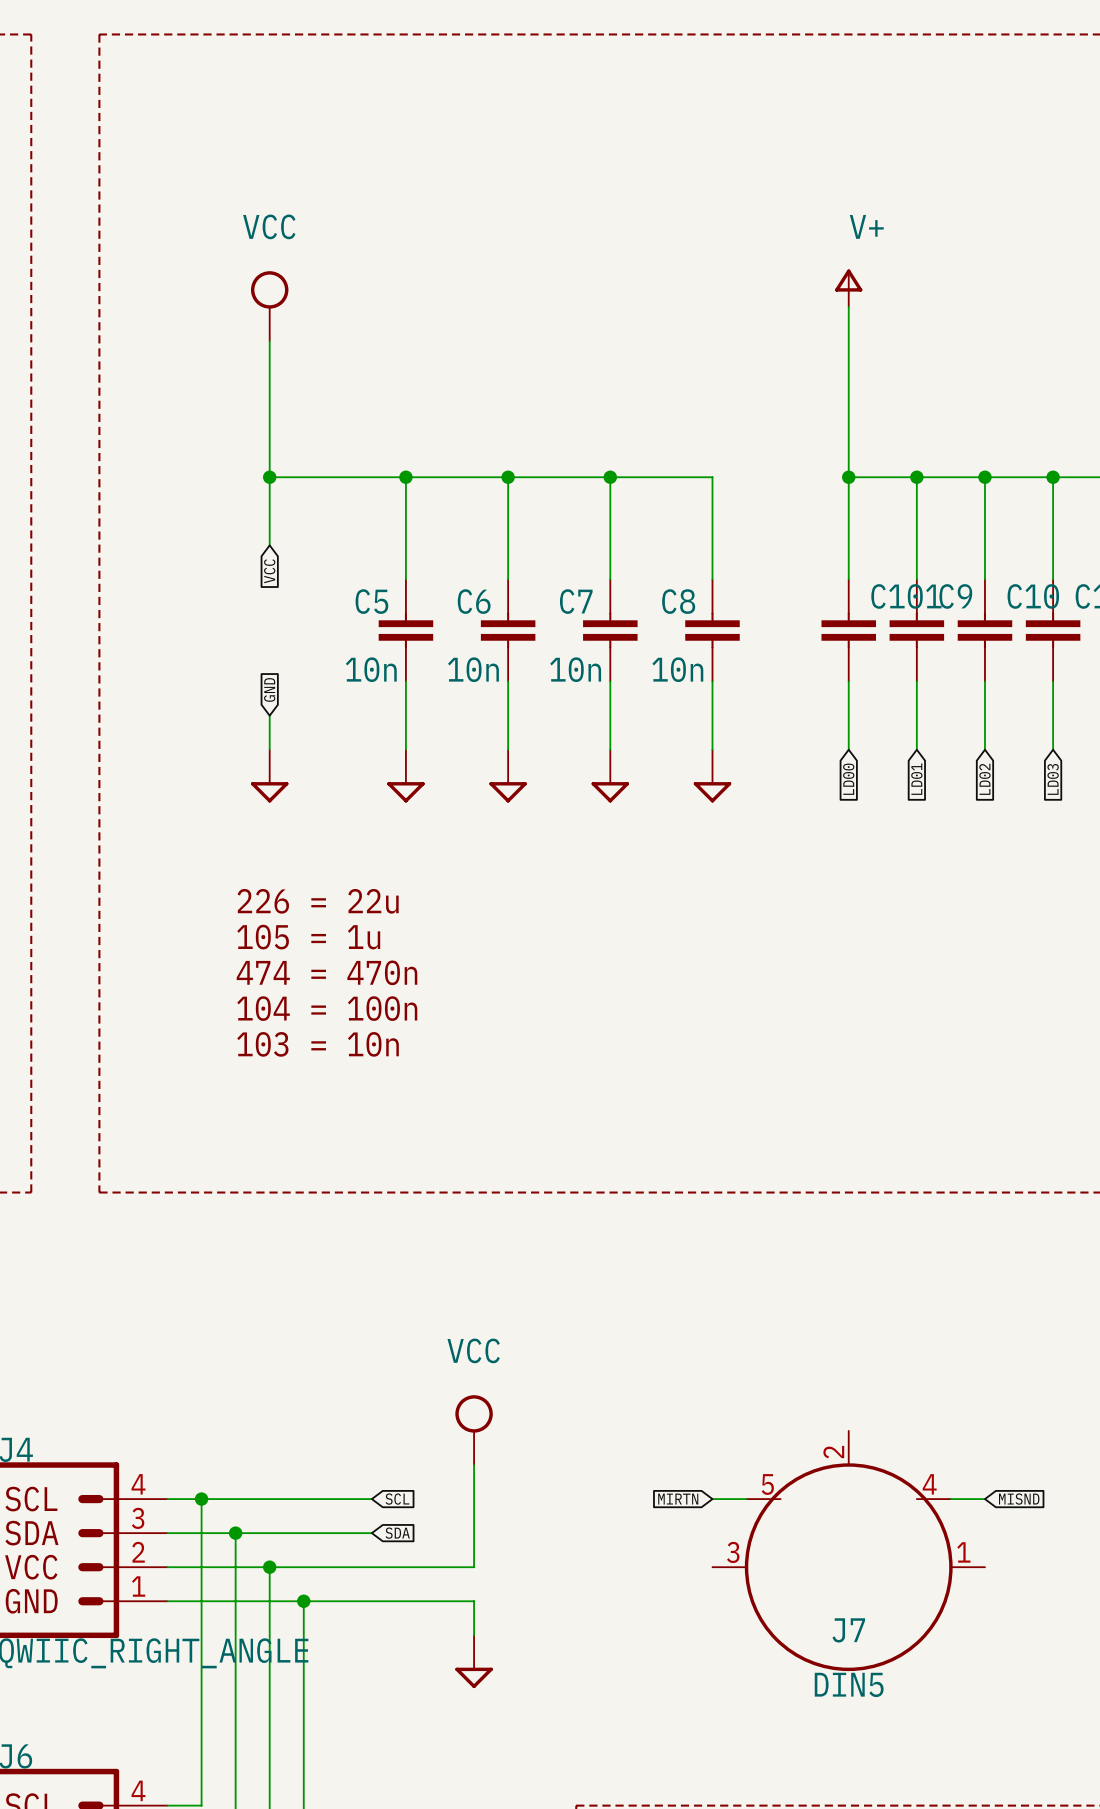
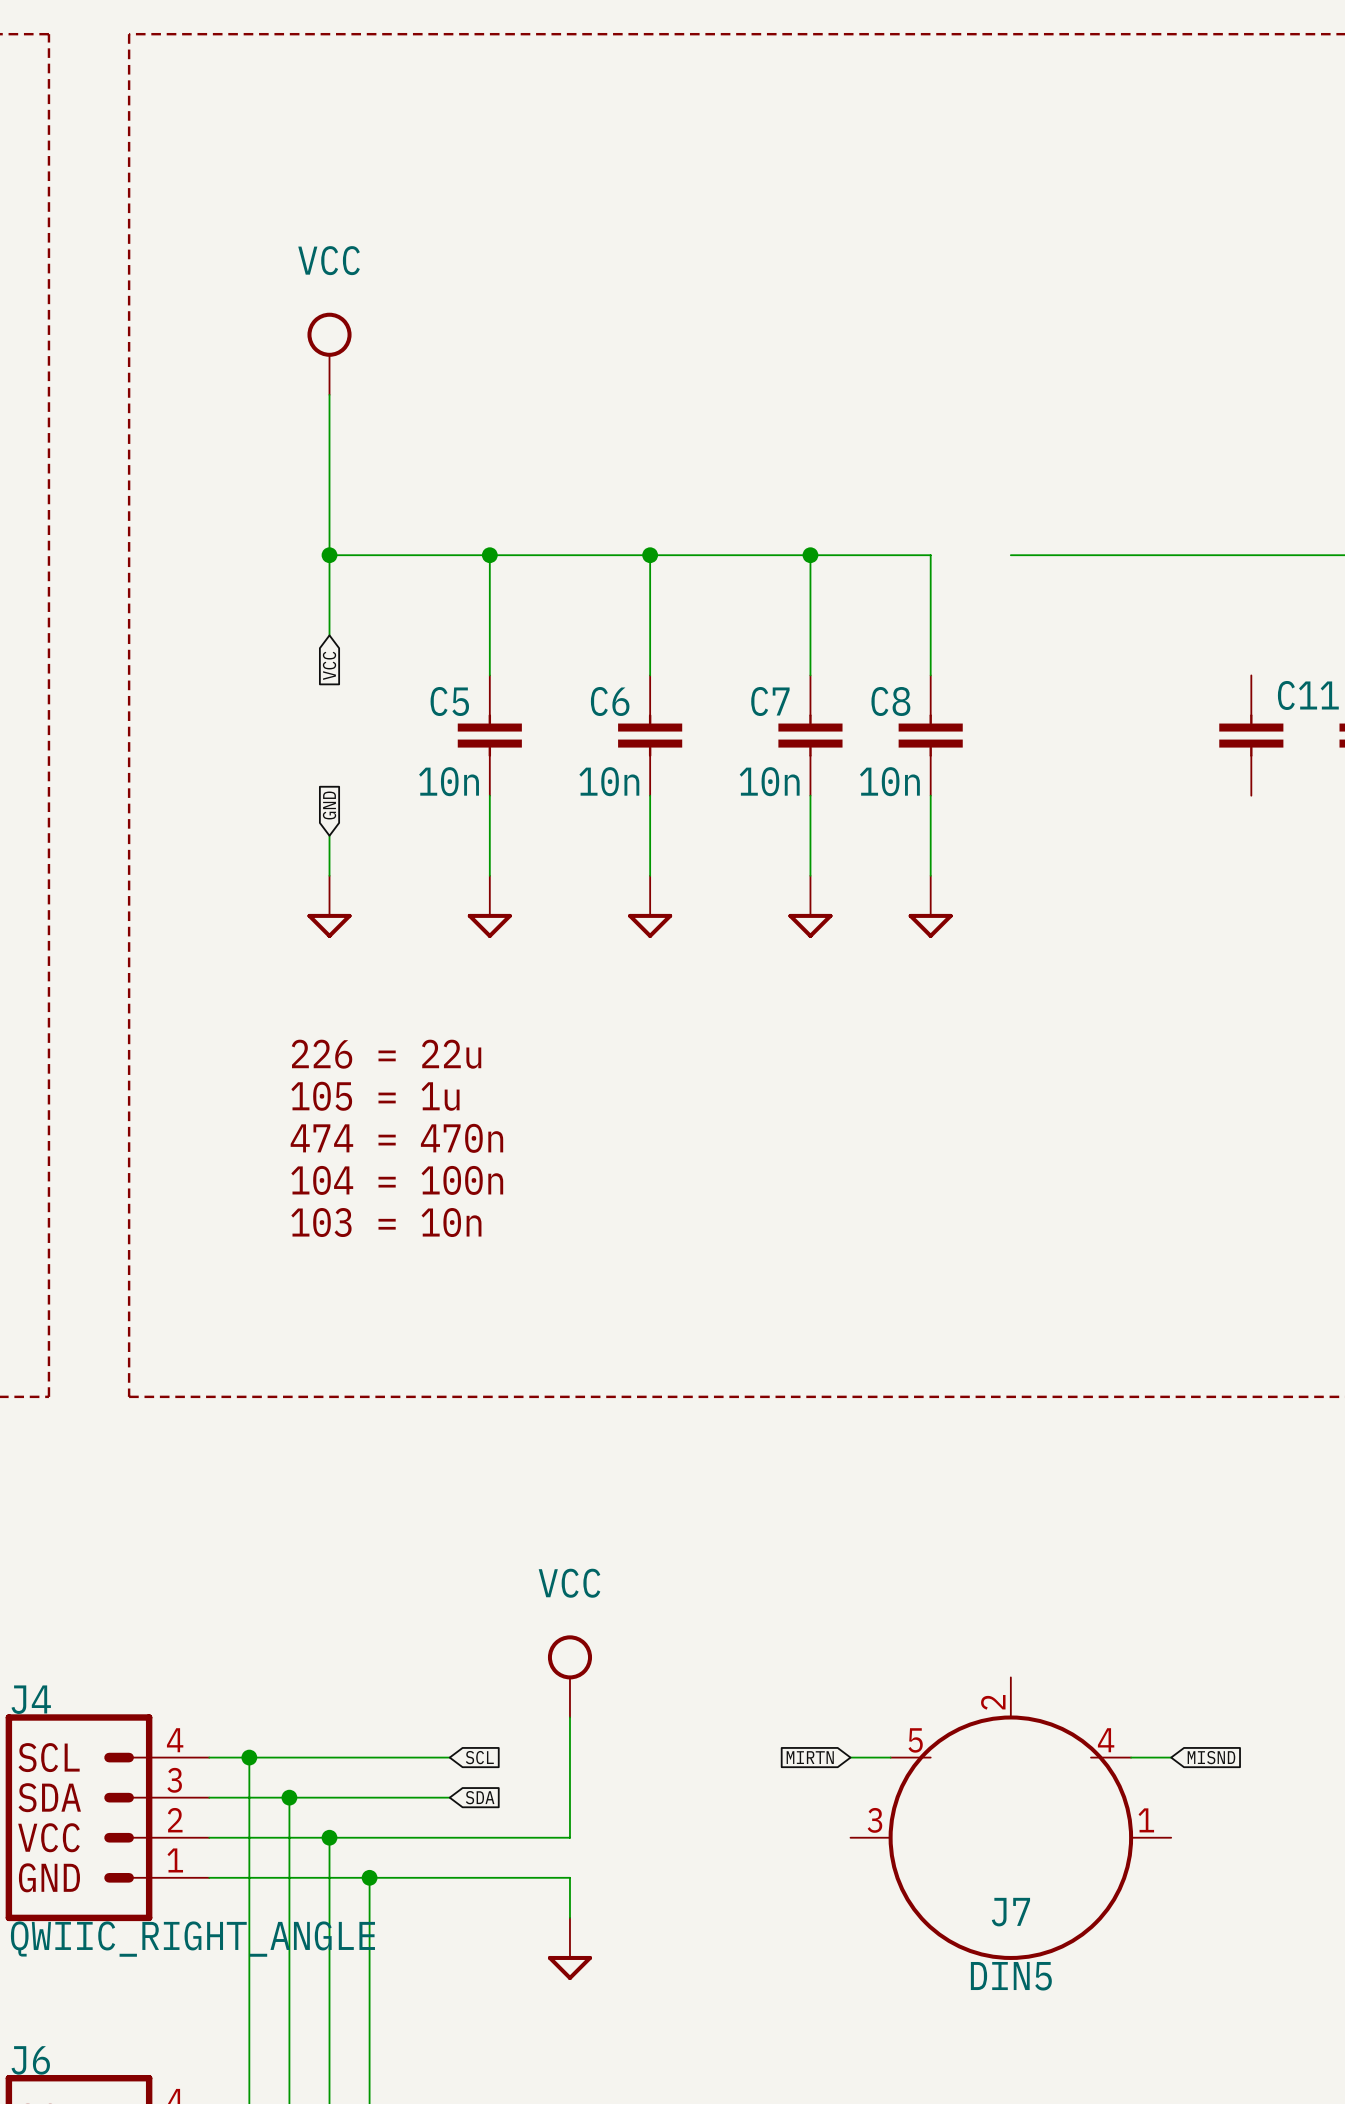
power symbol: V+ (848, 288) -> none
wire: (848, 306) (848, 579) -> none
wire: (508, 477) (508, 579) -> (650, 555) (650, 675)
junction: (508, 477) -> none
junction: none -> (650, 555)
wire: (610, 477) (610, 579) -> (810, 555) (810, 675)
junction: (610, 477) -> none
junction: none -> (810, 555)
wire: (712, 477) (712, 579) -> (850, 555) (930, 555) (930, 675)
junction: (848, 477) -> none
wire: (916, 477) (916, 579) -> none
junction: (916, 477) -> none
wire: (984, 477) (984, 579) -> none
junction: (984, 477) -> none
wire: (1053, 477) (1053, 579) -> none
junction: (1053, 477) -> none
C6 position: (508, 630) -> (650, 735)
C7 position: (610, 630) -> (810, 735)
C8 position: (712, 630) -> (930, 735)
C101: (848, 630) -> none
C9: (916, 630) -> none
C10: (984, 630) -> none
wire: (508, 681) (508, 749) -> none
wire: (610, 681) (610, 749) -> (810, 795) (810, 875)
wire: (712, 681) (712, 749) -> (930, 795) (930, 875)
wire: (848, 681) (848, 749) -> (650, 795) (650, 875)
wire: (916, 681) (916, 749) -> none
wire: (984, 681) (984, 749) -> none
wire: (1053, 681) (1053, 749) -> none
power symbol: (508, 776) -> none
power symbol: none -> (650, 906)
power symbol: (610, 776) -> none
power symbol: none -> (810, 906)
power symbol: (712, 776) -> none
power symbol: none -> (930, 906)
global label: LD00 (848, 779) -> none
global label: LD01 (916, 779) -> none
global label: LD02 (984, 779) -> none
global label: LD03 (1053, 779) -> none

